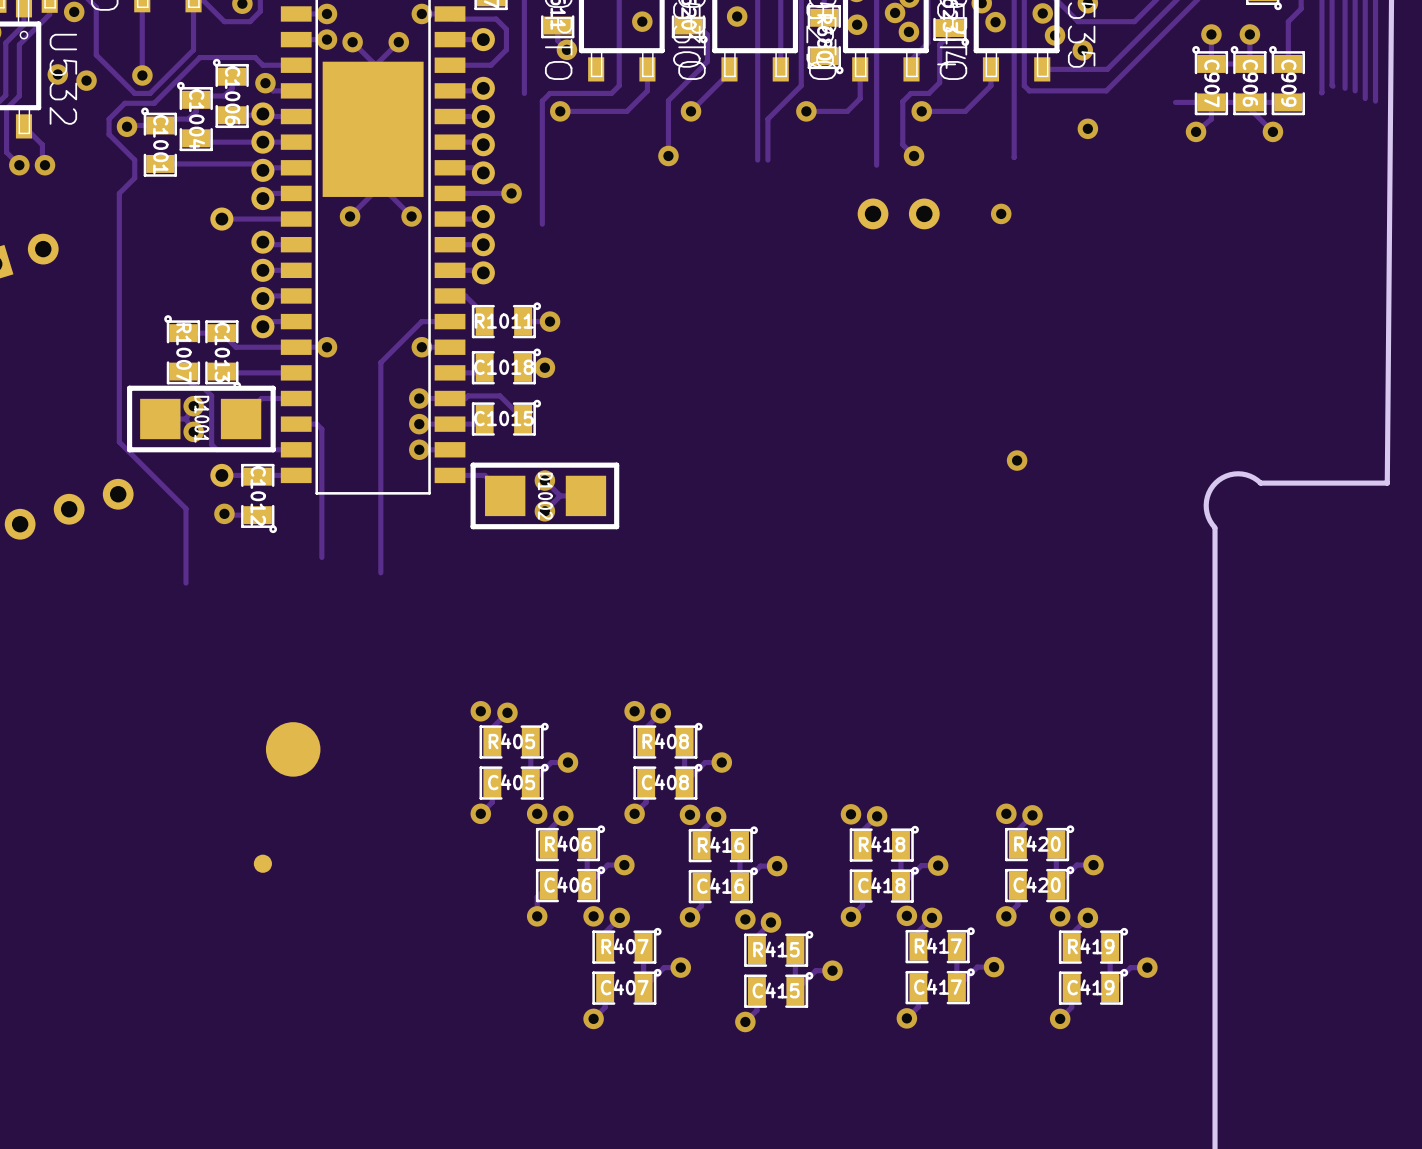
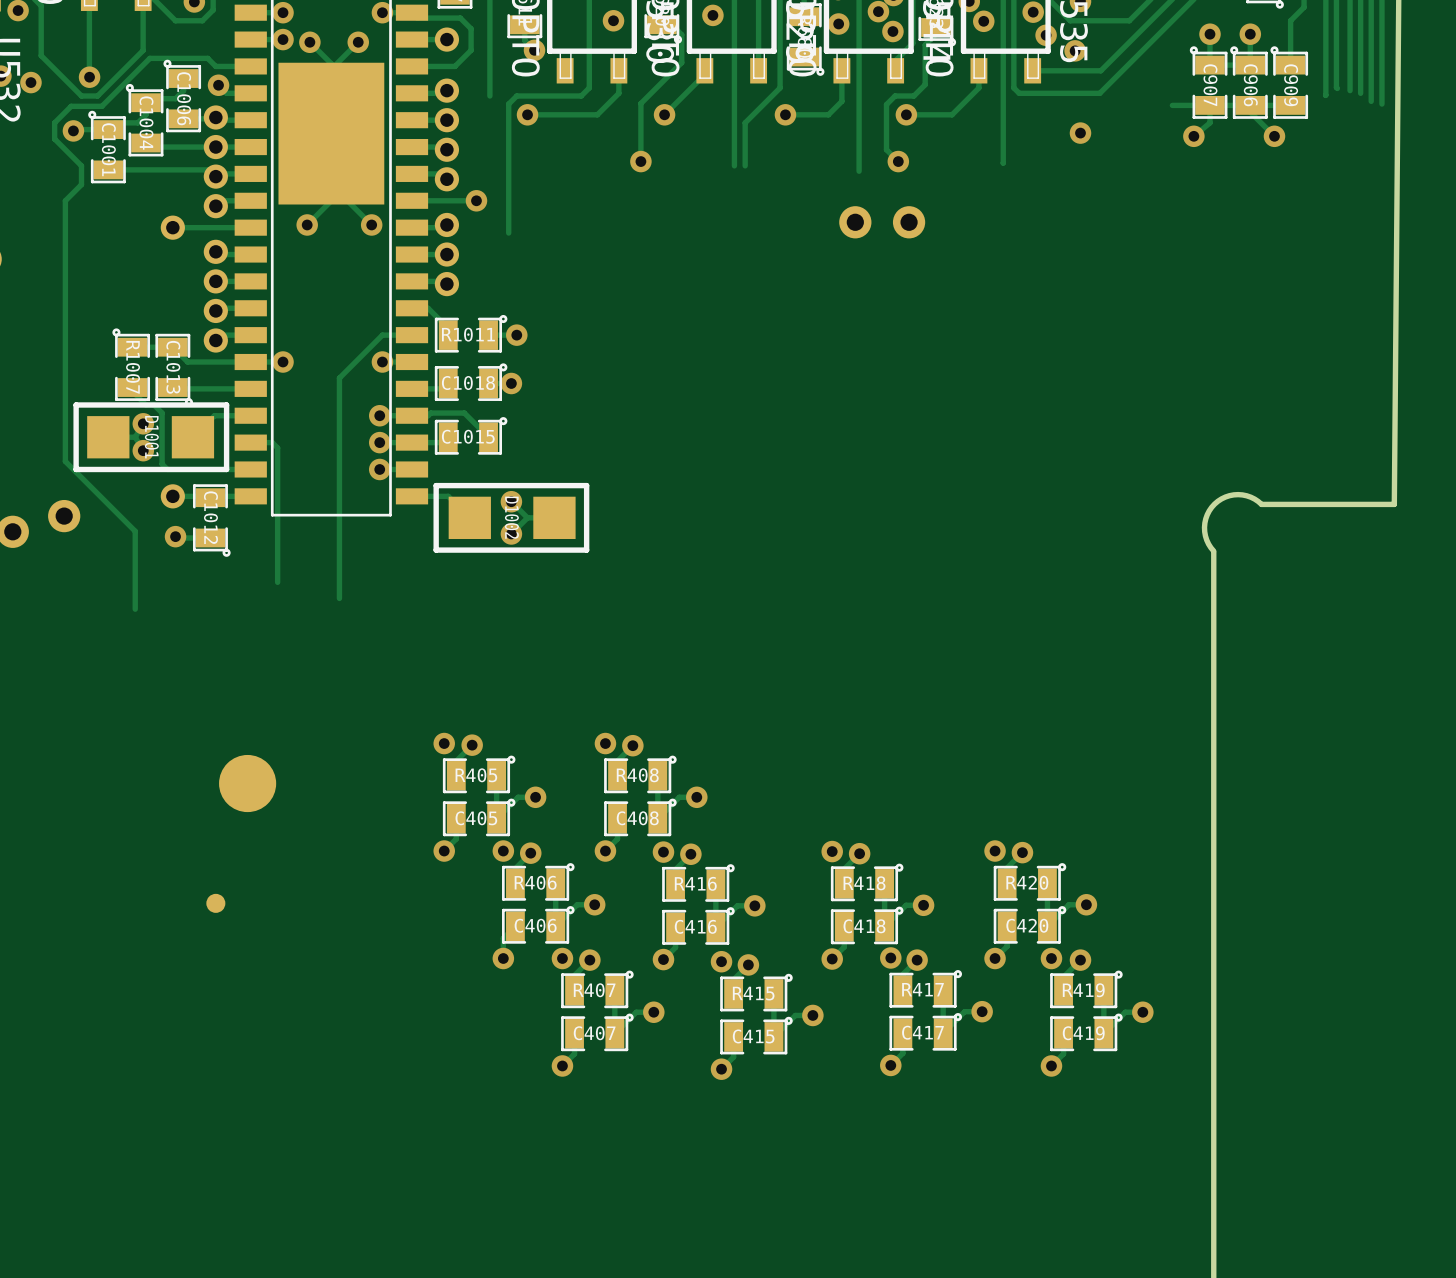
via: (1001, 213) -> none
via: (1017, 460) -> none

